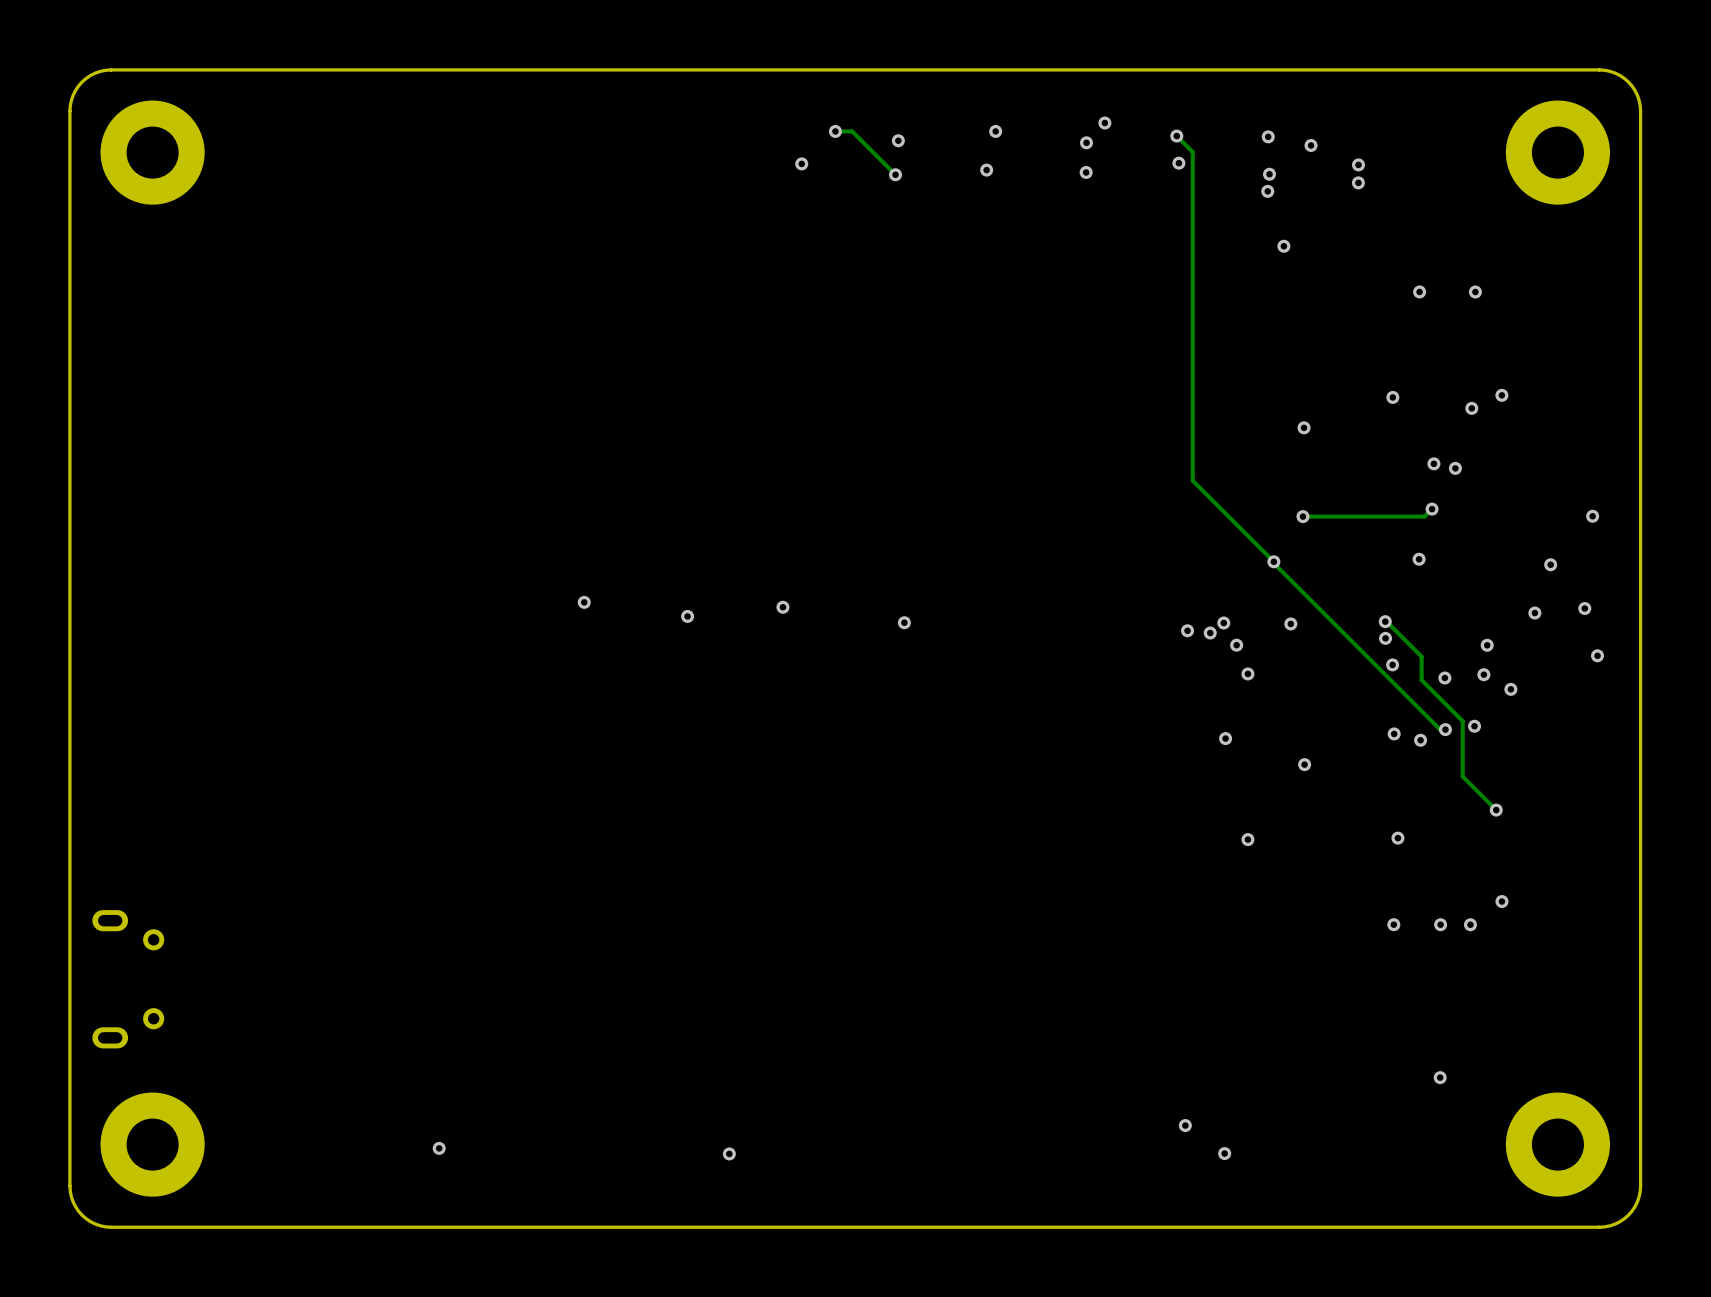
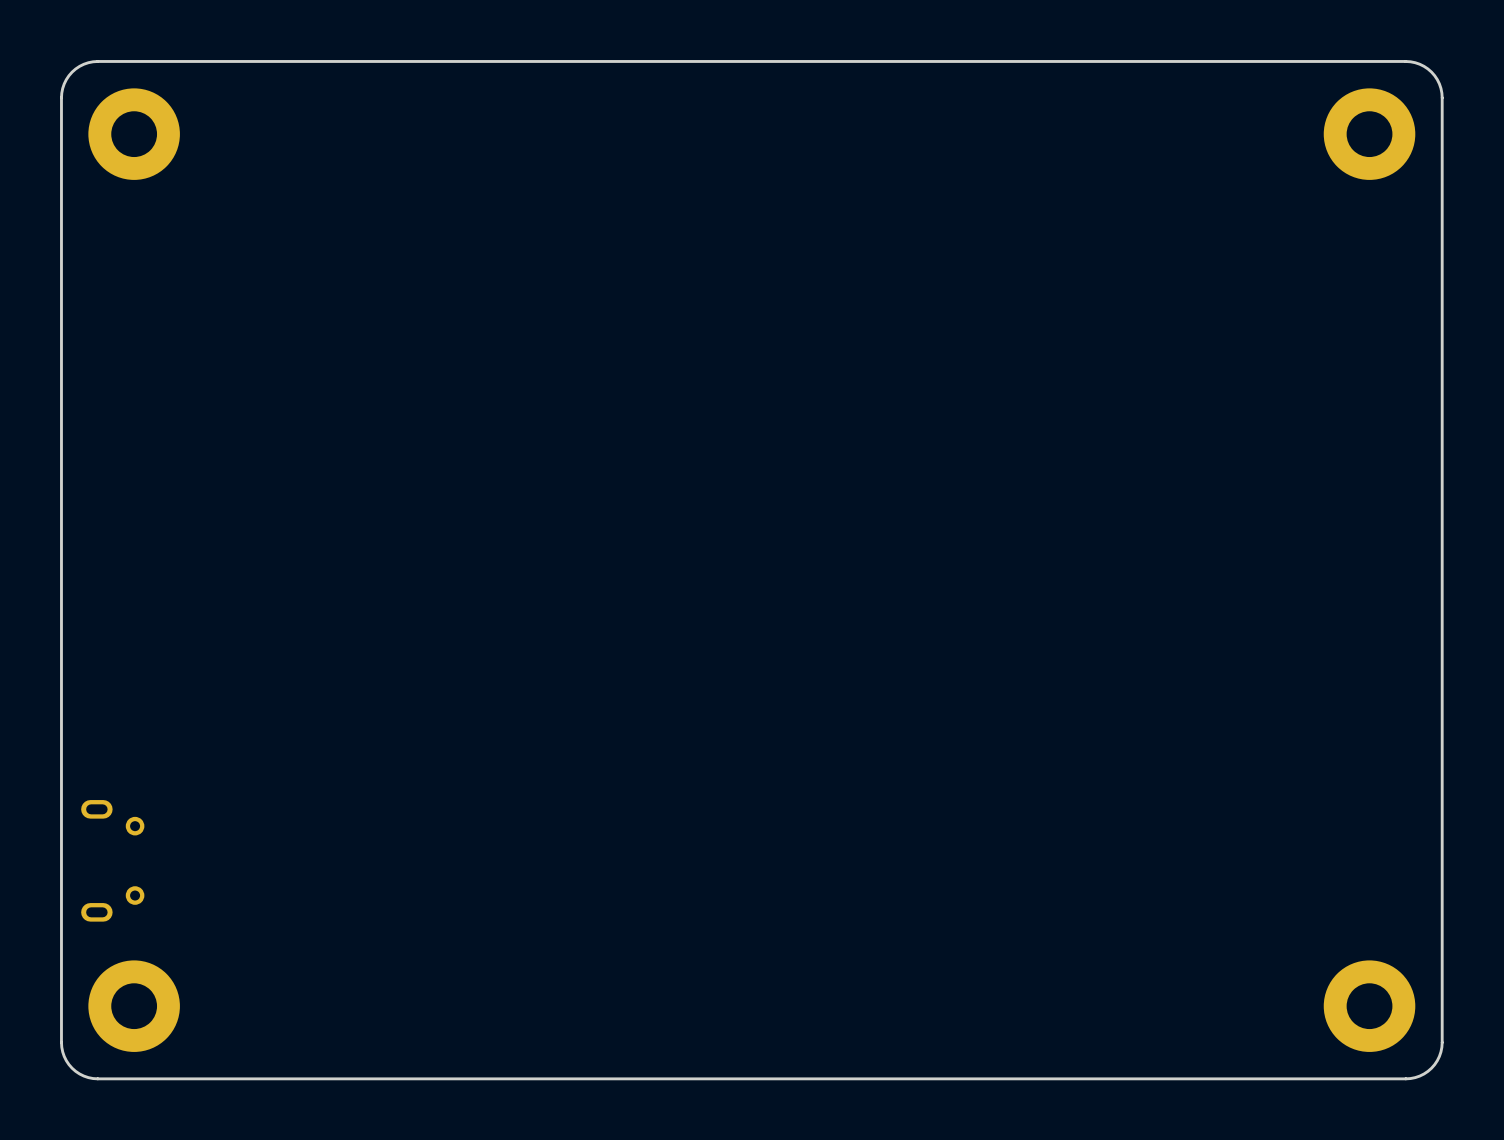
via: (1104, 123) -> none
track: (835, 131) (852, 131) (895, 174) -> none
via: (835, 131) -> none
via: (995, 131) -> none
track: (1176, 136) (1192, 152) (1192, 480) (1440, 729) (1445, 729) -> none
via: (1176, 136) -> none
via: (1268, 136) -> none
via: (898, 140) -> none
via: (1086, 142) -> none
via: (1311, 145) -> none
via: (801, 163) -> none
via: (1178, 163) -> none
via: (1358, 164) -> none
via: (986, 170) -> none
via: (1086, 172) -> none
via: (895, 174) -> none
via: (1269, 174) -> none
via: (1358, 182) -> none
via: (1267, 191) -> none
via: (1283, 246) -> none
via: (1419, 291) -> none
via: (1475, 292) -> none
via: (1501, 395) -> none
via: (1392, 397) -> none
via: (1471, 408) -> none
via: (1304, 427) -> none
via: (1433, 463) -> none
via: (1455, 468) -> none
track: (1432, 509) (1424, 516) (1302, 516) -> none
via: (1432, 509) -> none
via: (1302, 516) -> none
via: (1592, 516) -> none
via: (1419, 559) -> none
via: (1273, 561) -> none
via: (1550, 564) -> none
via: (584, 602) -> none
via: (782, 607) -> none
via: (1584, 608) -> none
via: (1534, 613) -> none
via: (687, 616) -> none
track: (1385, 621) (1421, 656) (1421, 680) (1462, 721) (1462, 776) (1496, 810) -> none
via: (1385, 621) -> none
via: (904, 622) -> none
via: (1223, 623) -> none
via: (1290, 623) -> none
via: (1187, 630) -> none
via: (1210, 633) -> none
via: (1385, 638) -> none
via: (1236, 645) -> none
via: (1487, 645) -> none
via: (1597, 655) -> none
via: (1392, 664) -> none
via: (1247, 673) -> none
via: (1483, 674) -> none
via: (1444, 678) -> none
via: (1510, 689) -> none
via: (1474, 726) -> none
via: (1445, 729) -> none
via: (1394, 733) -> none
via: (1225, 738) -> none
via: (1420, 740) -> none
via: (1304, 764) -> none
via: (1496, 810) -> none
via: (1397, 838) -> none
via: (1247, 839) -> none
via: (1501, 901) -> none
via: (1393, 924) -> none
via: (1440, 924) -> none
via: (1470, 924) -> none
via: (1440, 1077) -> none
via: (1185, 1125) -> none
via: (439, 1148) -> none
via: (729, 1153) -> none
via: (1224, 1153) -> none

